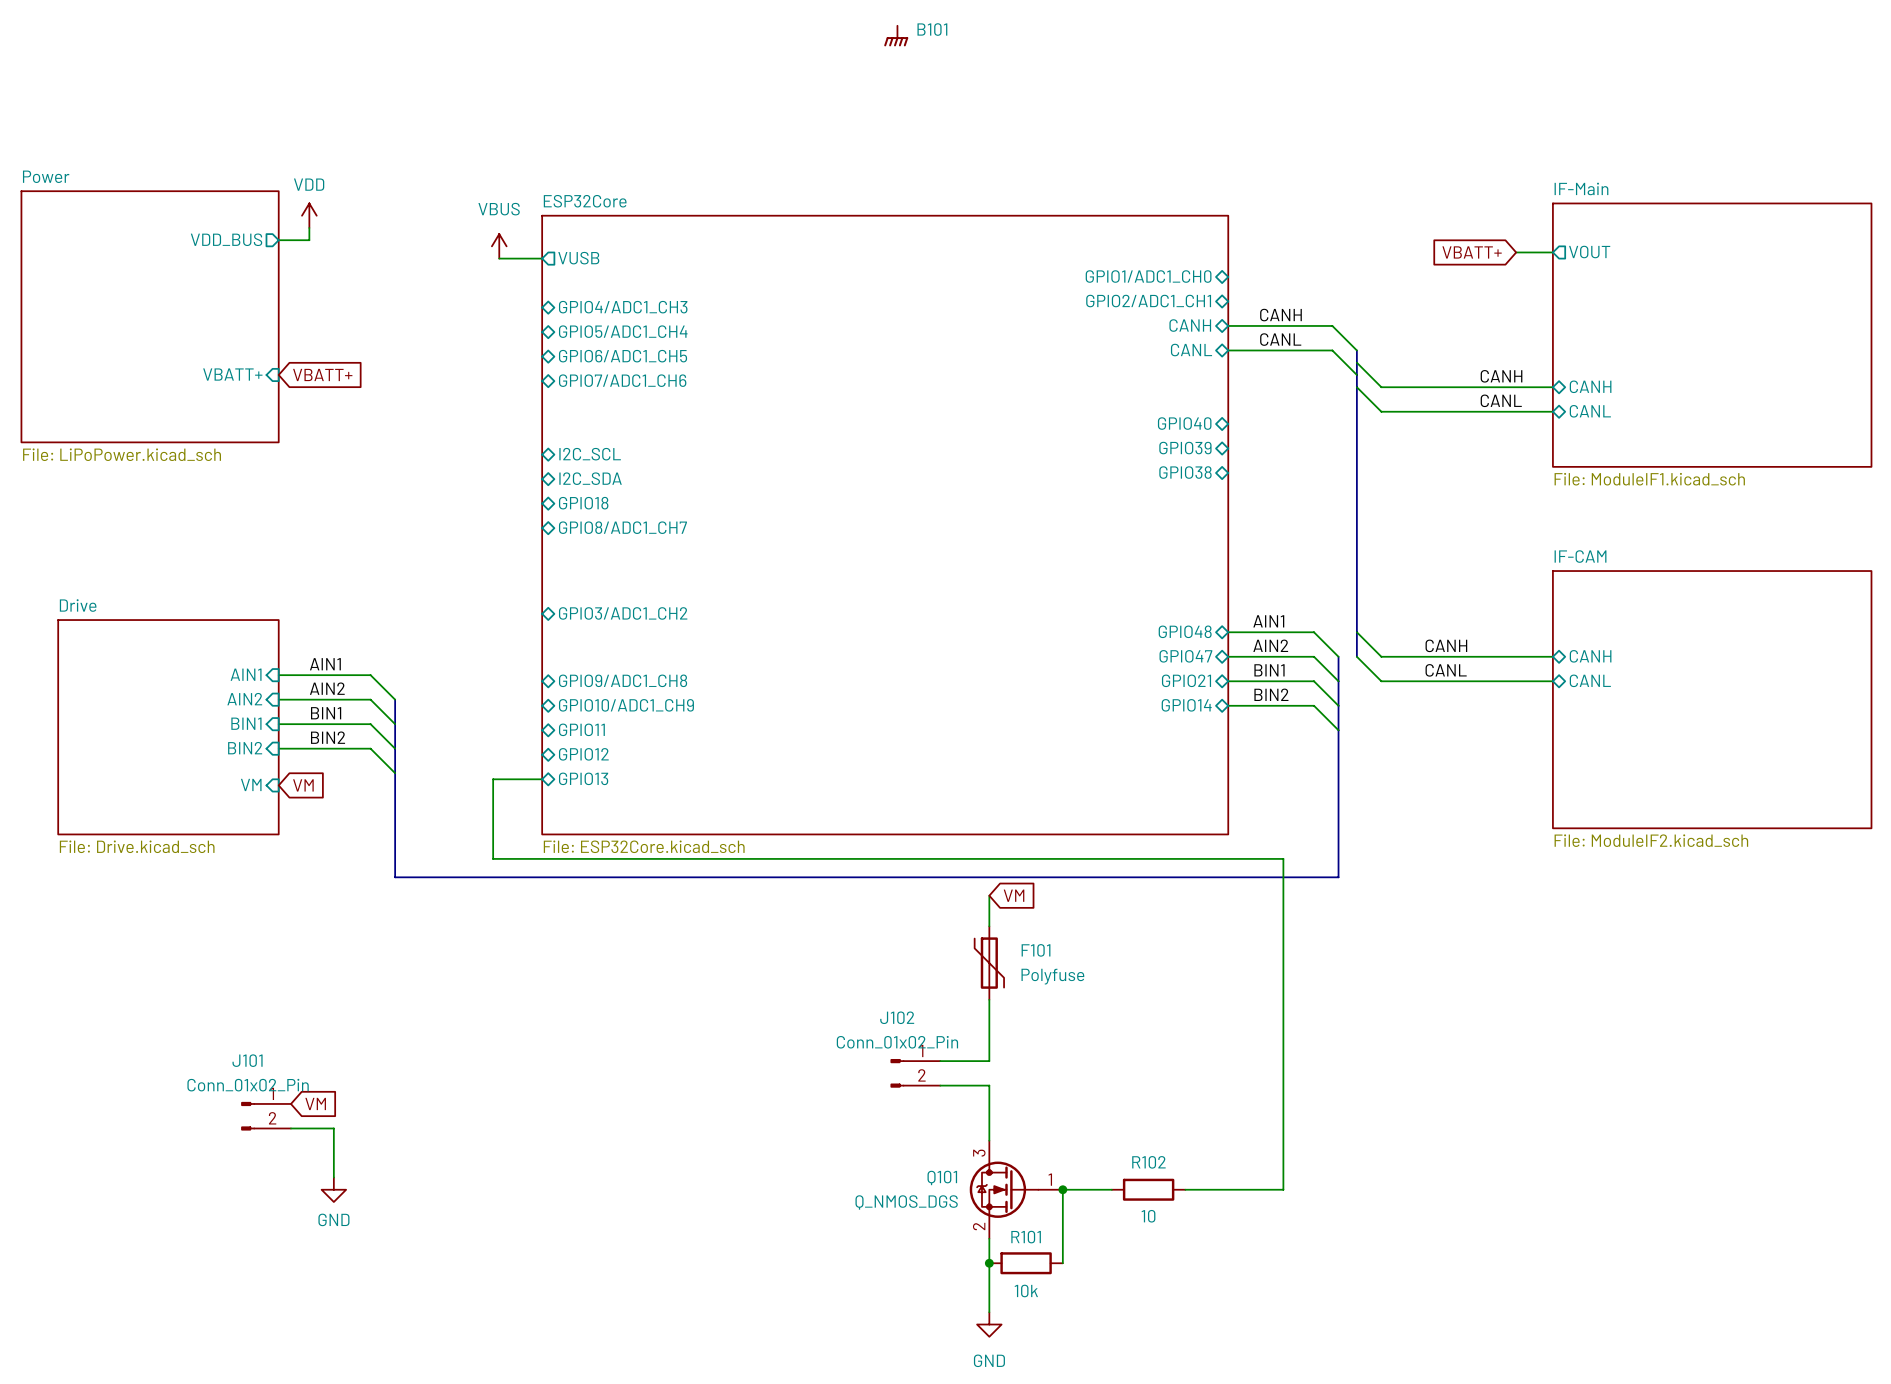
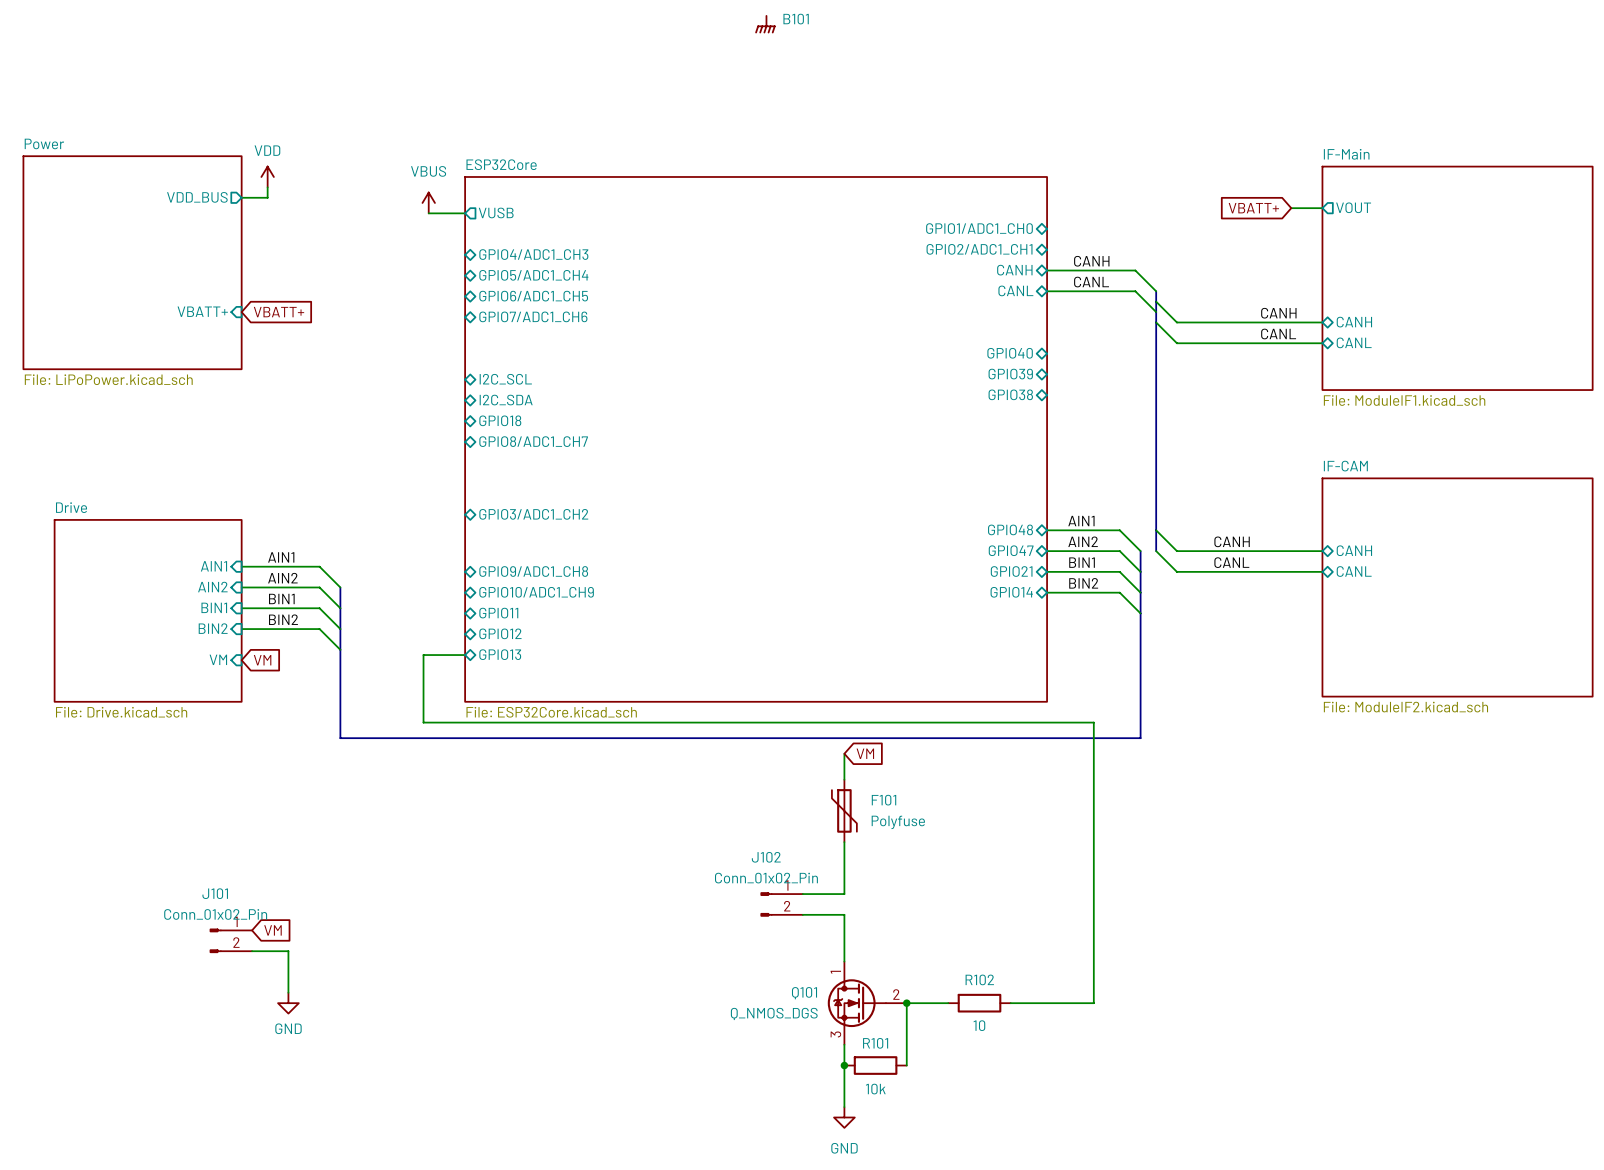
Q101 pin number: 3 (979, 1153) -> 1 (835, 972)
Q101 pin number: 1 (1050, 1179) -> 2 (896, 994)
Q101 pin number: 2 (979, 1226) -> 3 (835, 1034)

